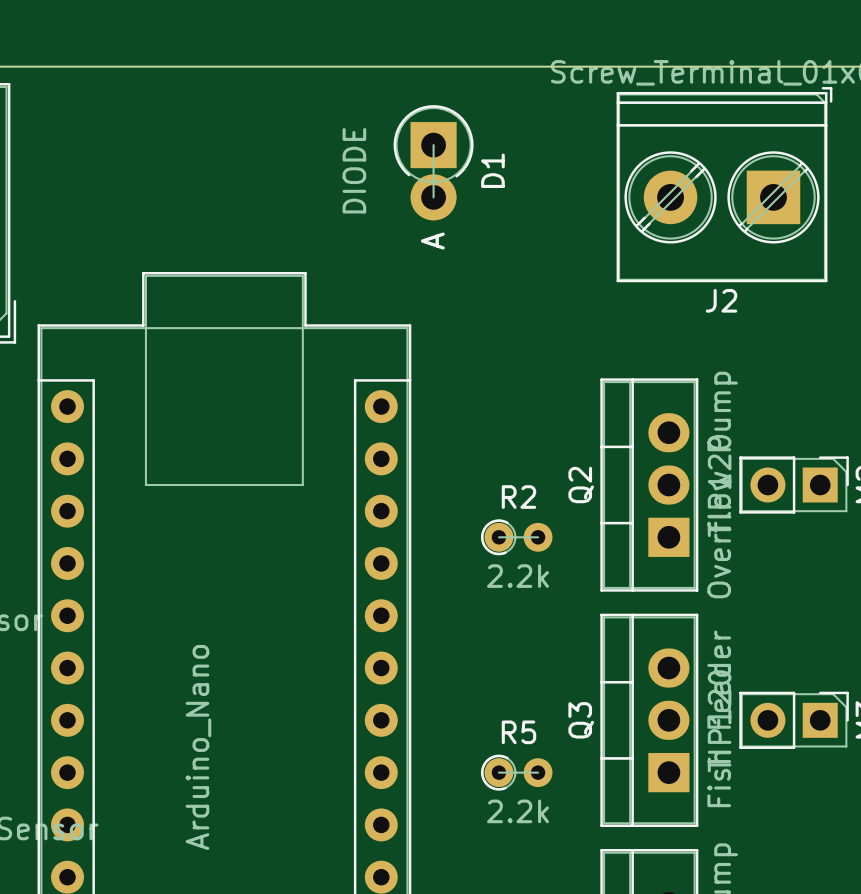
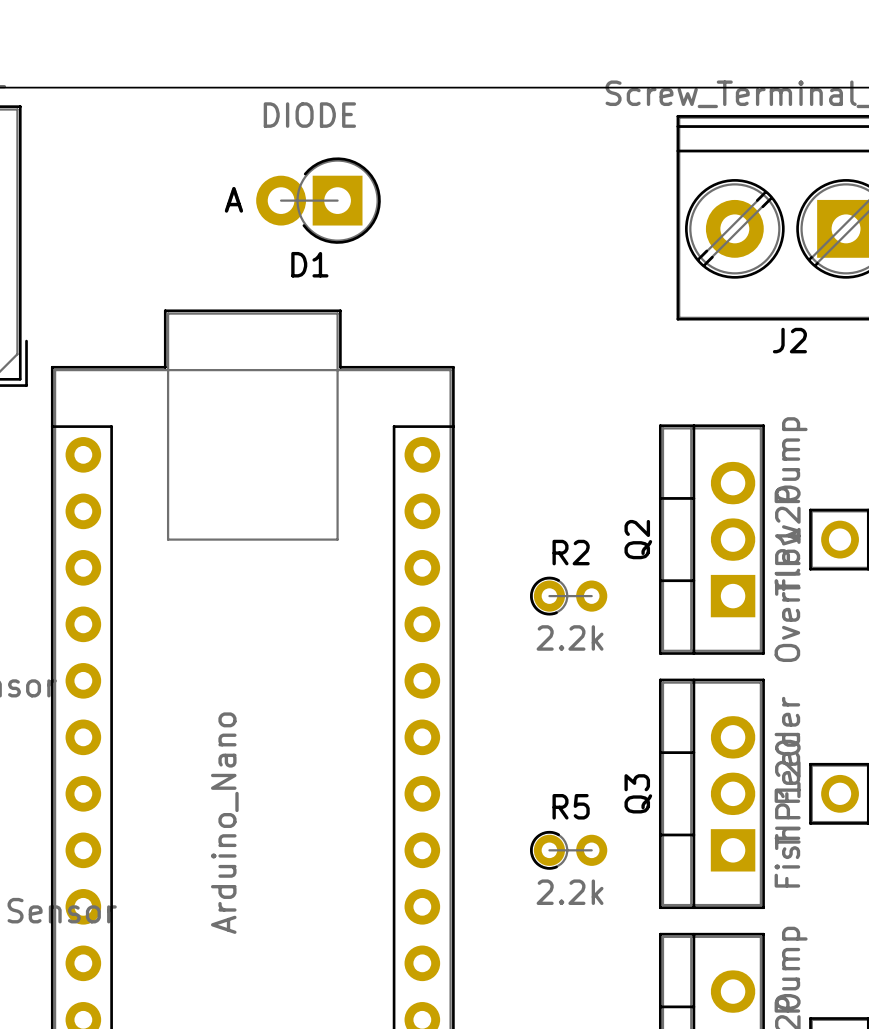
D1 rotation: 0° (433, 162) -> 90° clockwise (318, 200)
D1 position: (433, 162) -> (318, 200)

